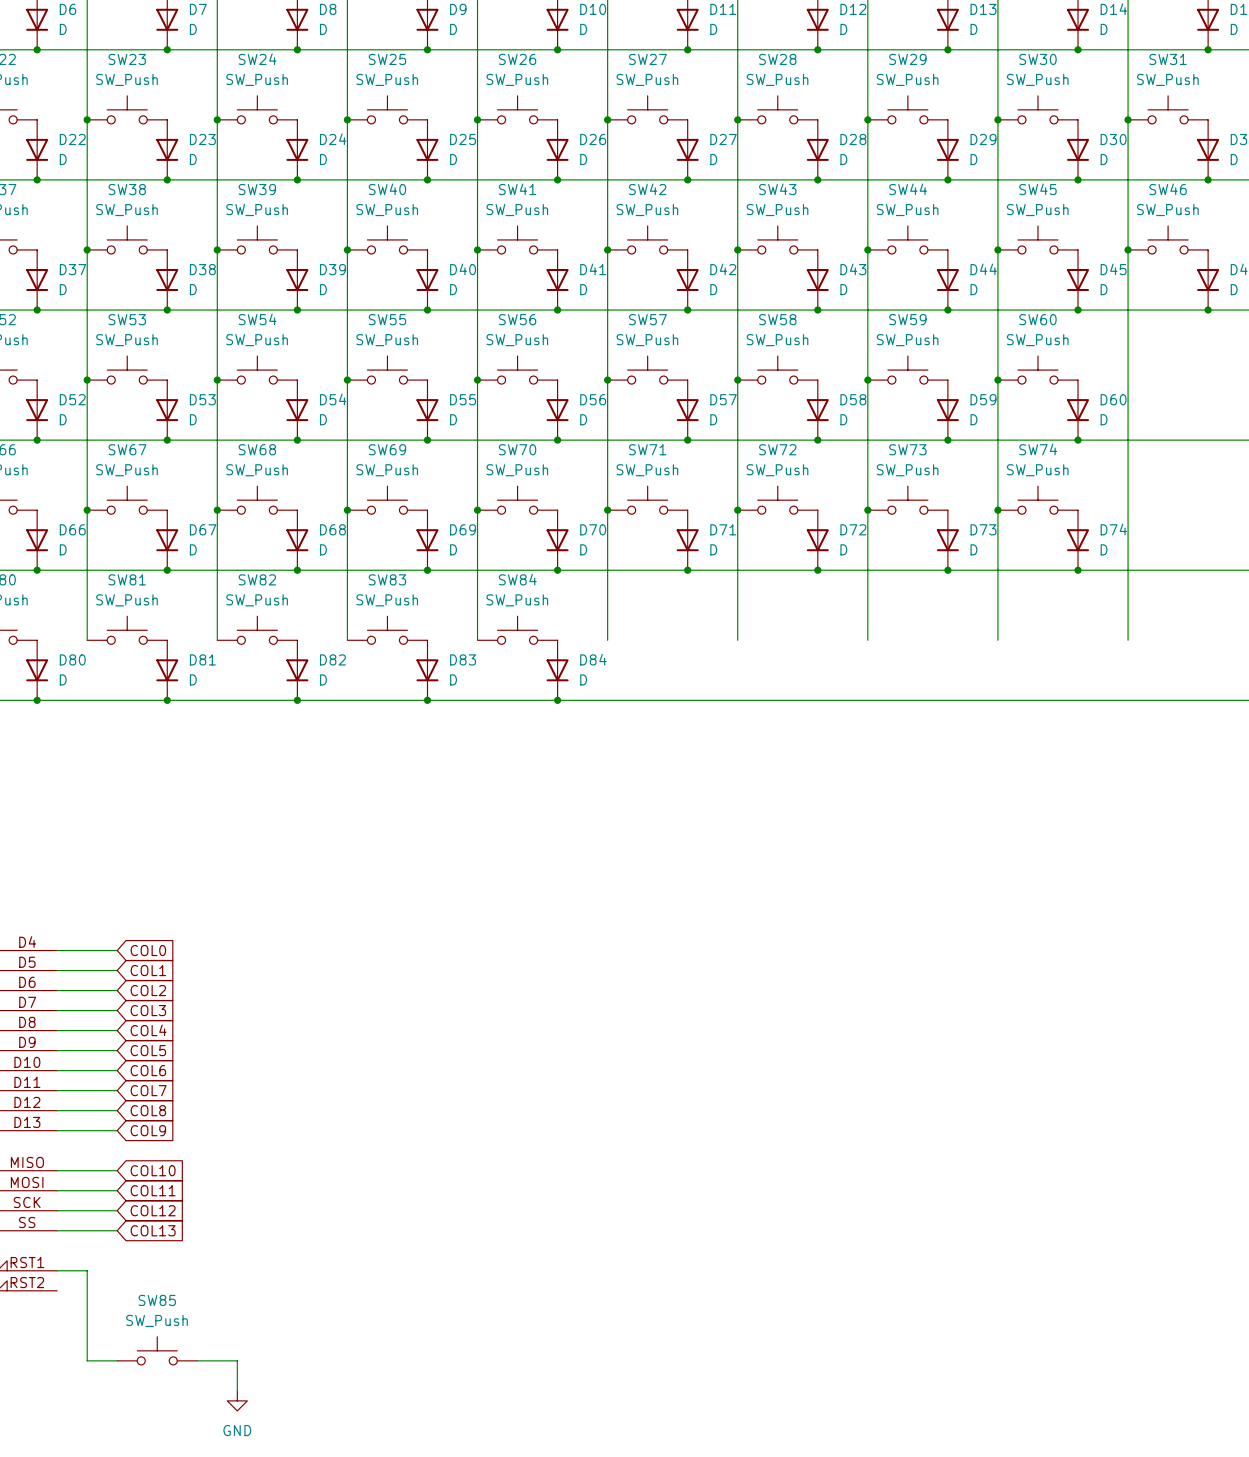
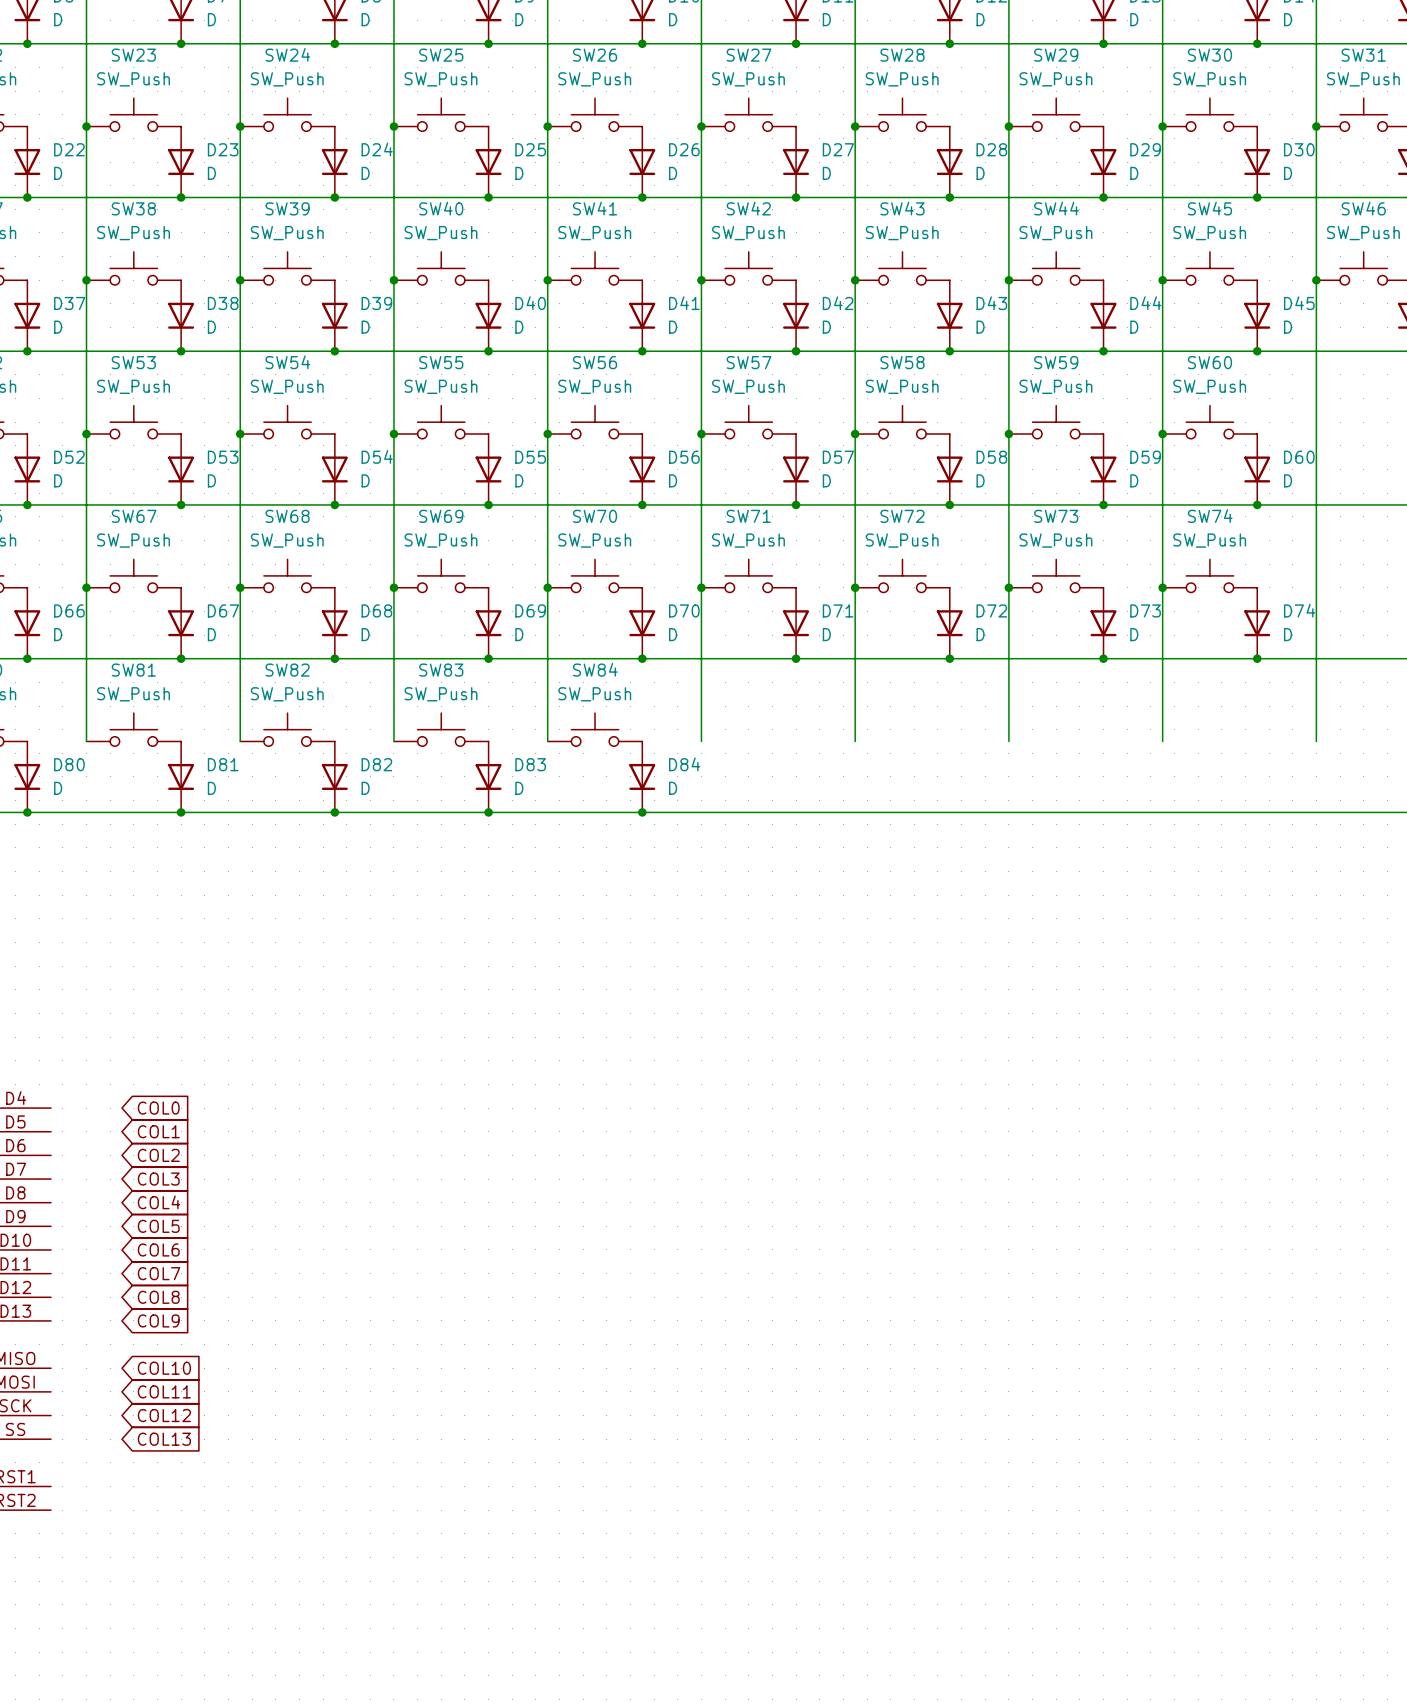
wire: (57, 950) (117, 950) -> none
wire: (57, 970) (117, 970) -> none
wire: (57, 990) (117, 990) -> none
wire: (57, 1010) (117, 1010) -> none
wire: (57, 1030) (117, 1030) -> none
wire: (57, 1050) (117, 1050) -> none
wire: (57, 1070) (117, 1070) -> none
wire: (57, 1090) (117, 1090) -> none
wire: (57, 1110) (117, 1110) -> none
wire: (57, 1130) (117, 1130) -> none
wire: (57, 1170) (117, 1170) -> none
wire: (57, 1190) (117, 1190) -> none
wire: (57, 1210) (117, 1210) -> none
wire: (57, 1230) (117, 1230) -> none
wire: (57, 1270) (87, 1270) (87, 1360) (117, 1360) -> none
SW85: SW_Push (157, 1350) -> none
wire: (197, 1360) (237, 1360) (237, 1390) -> none
power symbol: GND (237, 1400) -> none

